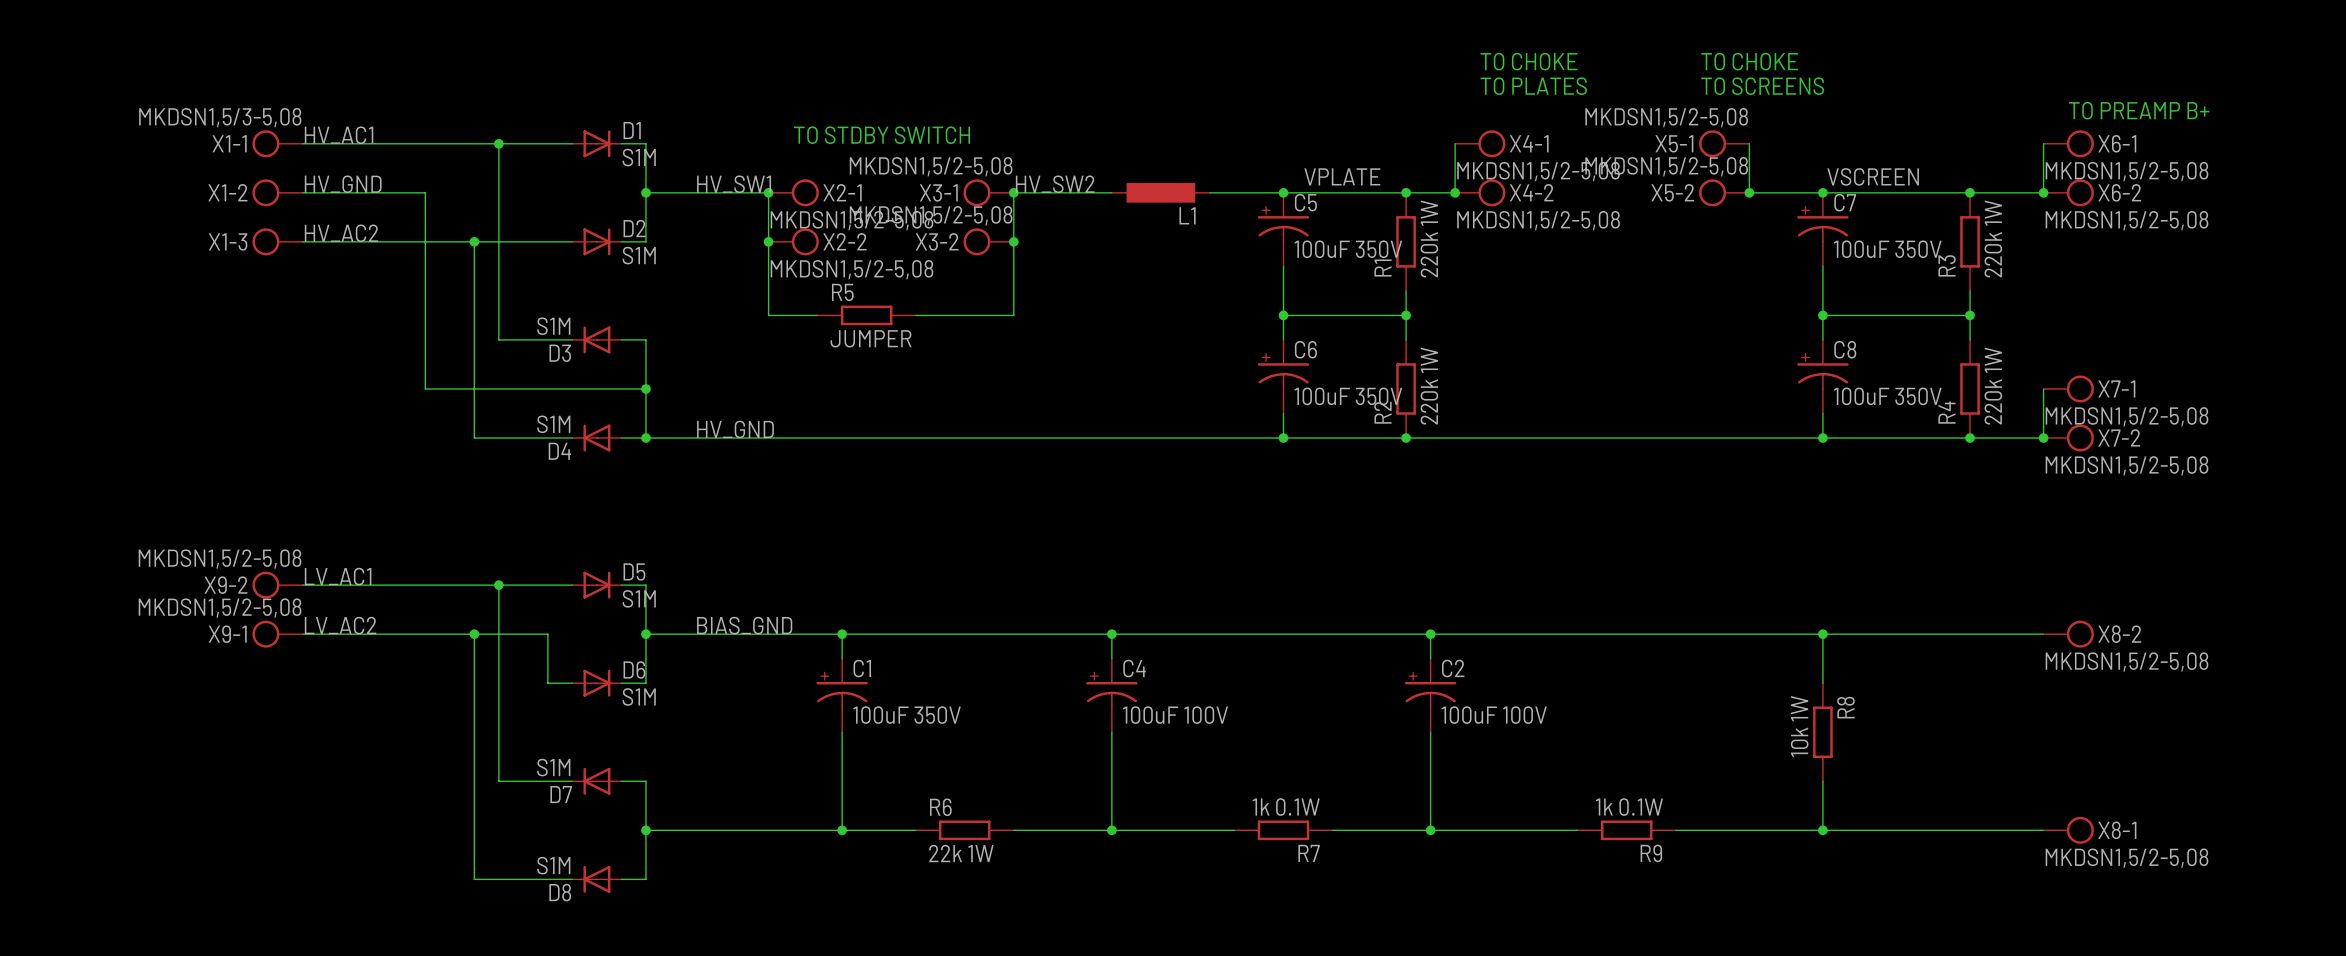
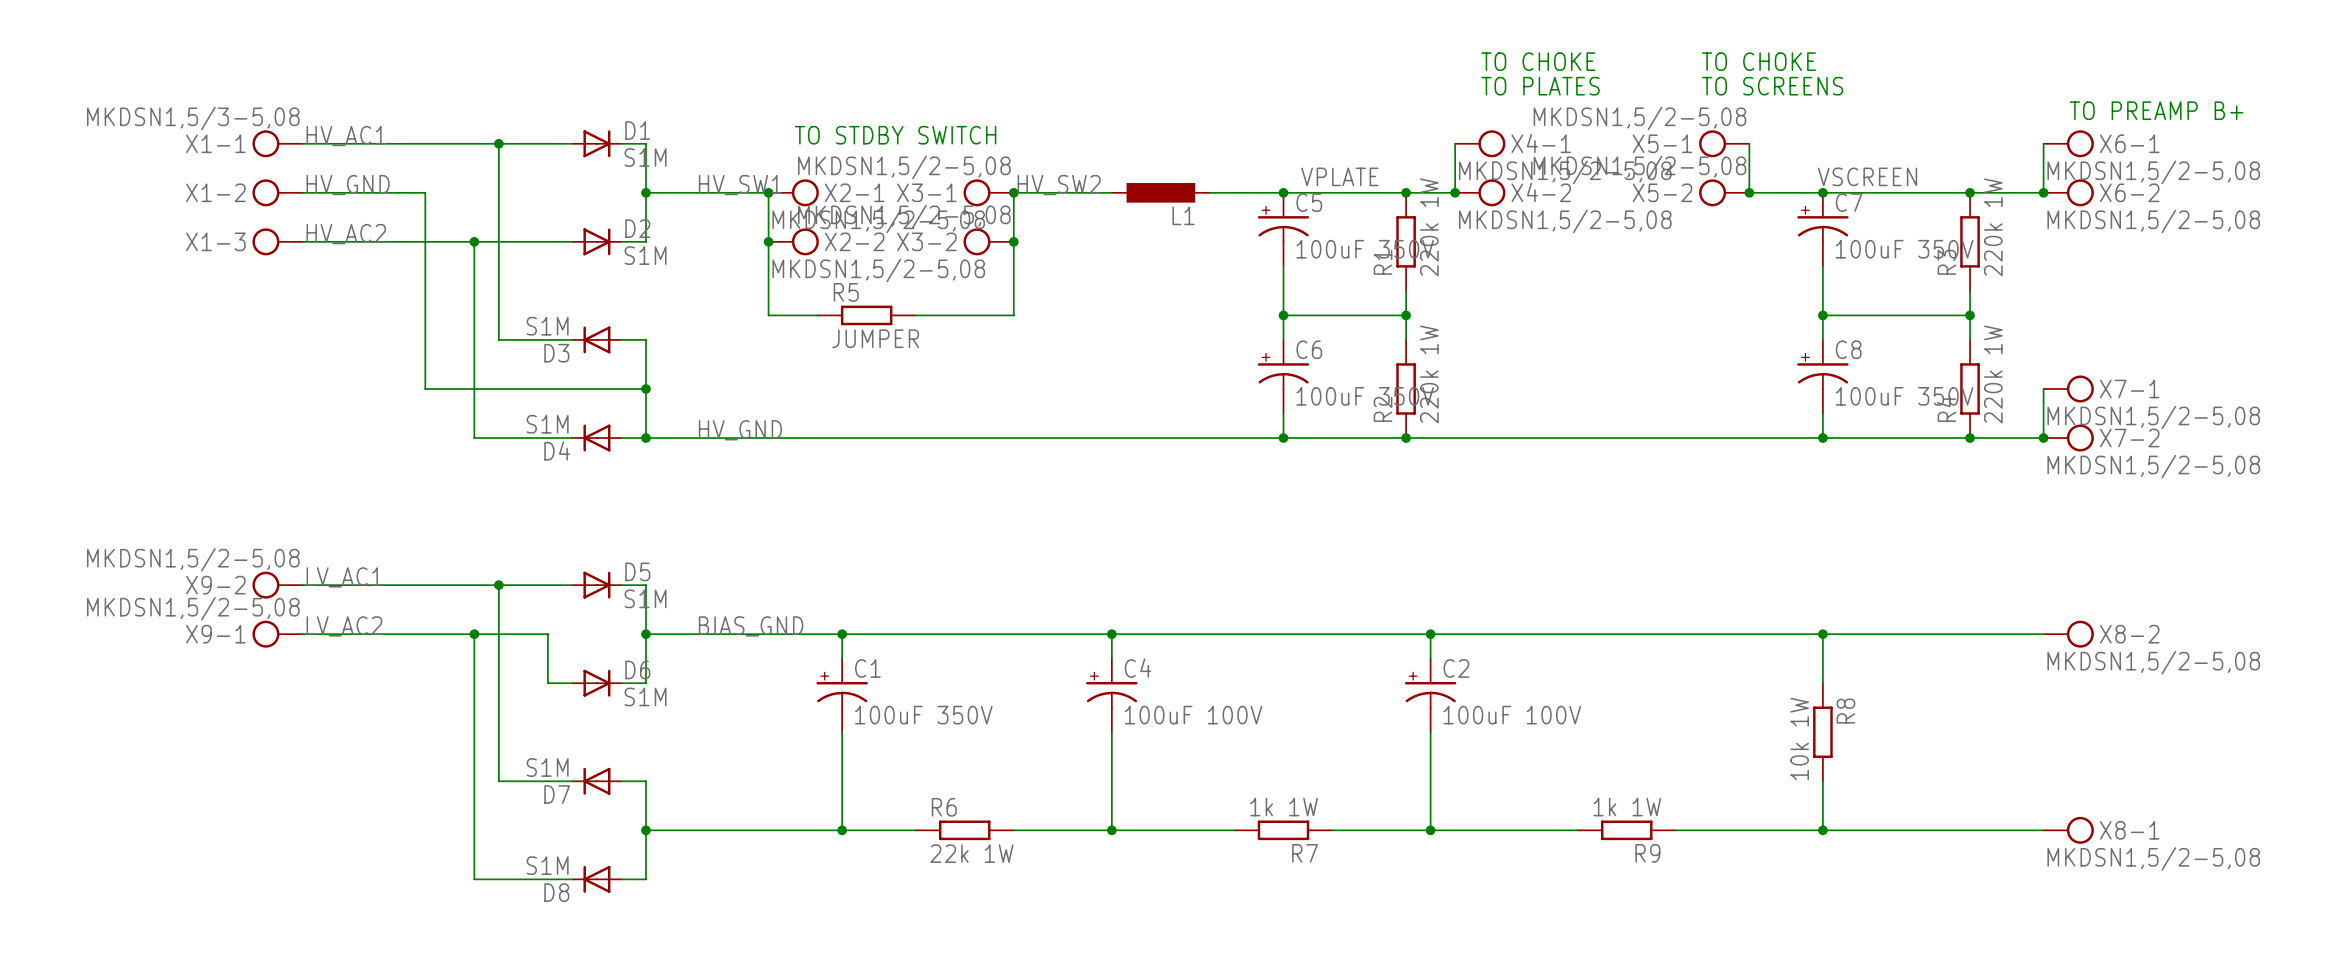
R7 value: 1k 0.1W (1286, 807) -> 1k 1W (1284, 807)
R9 value: 1k 0.1W (1629, 807) -> 1k 1W (1627, 807)

